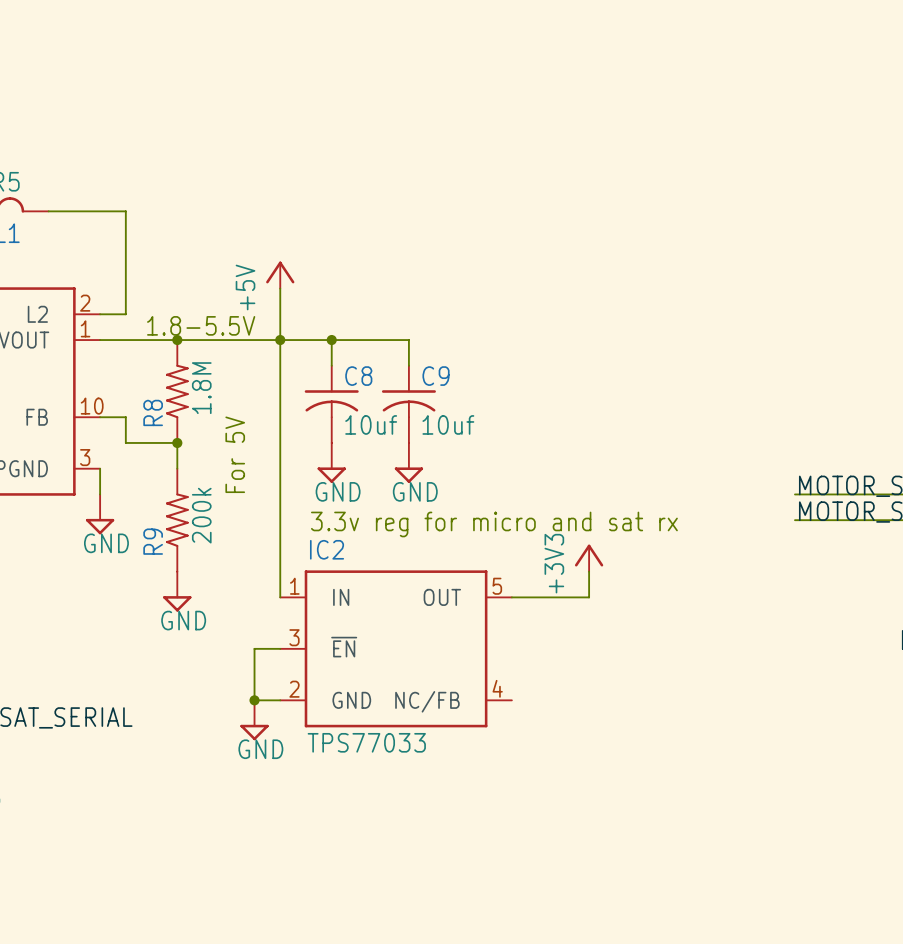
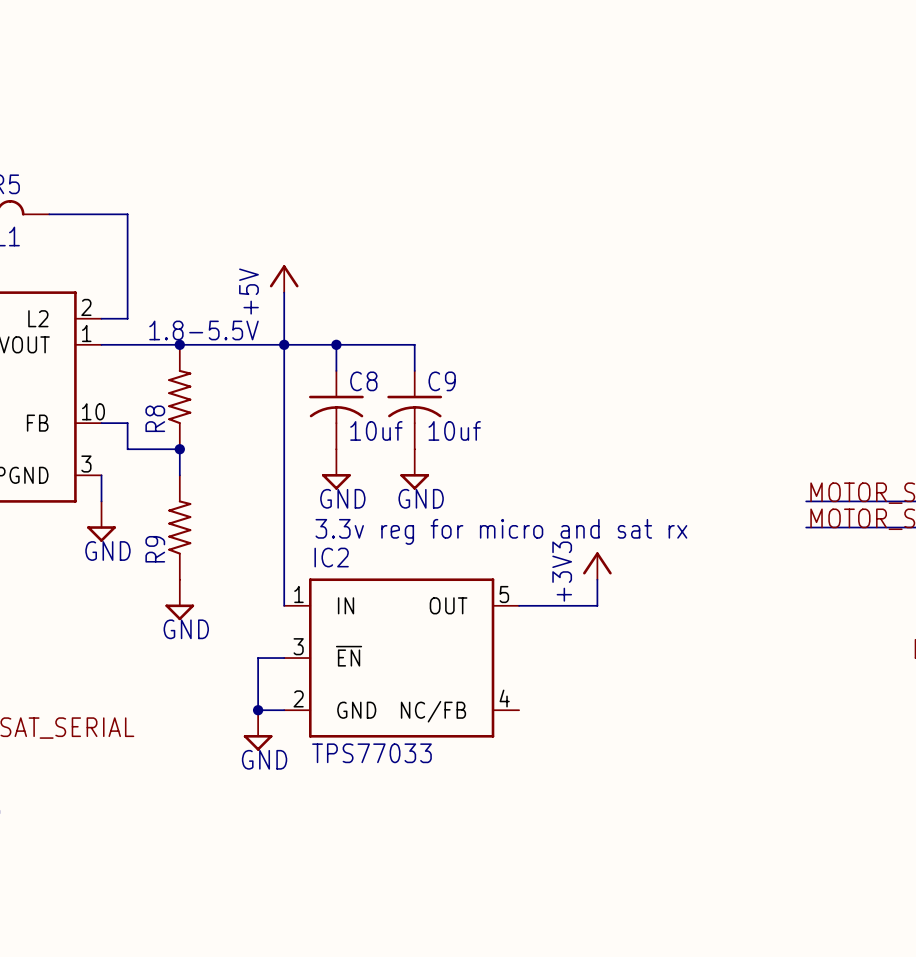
R8 value: 1.8M (201, 388) -> none
text: For 5V (235, 454) -> none
R9 value: 200k (201, 515) -> none

